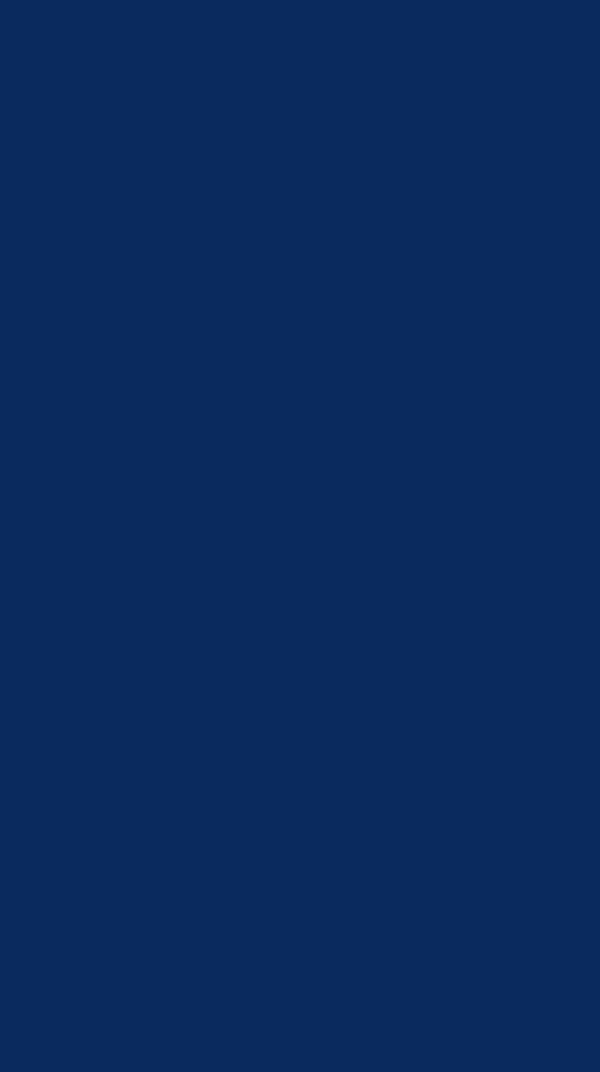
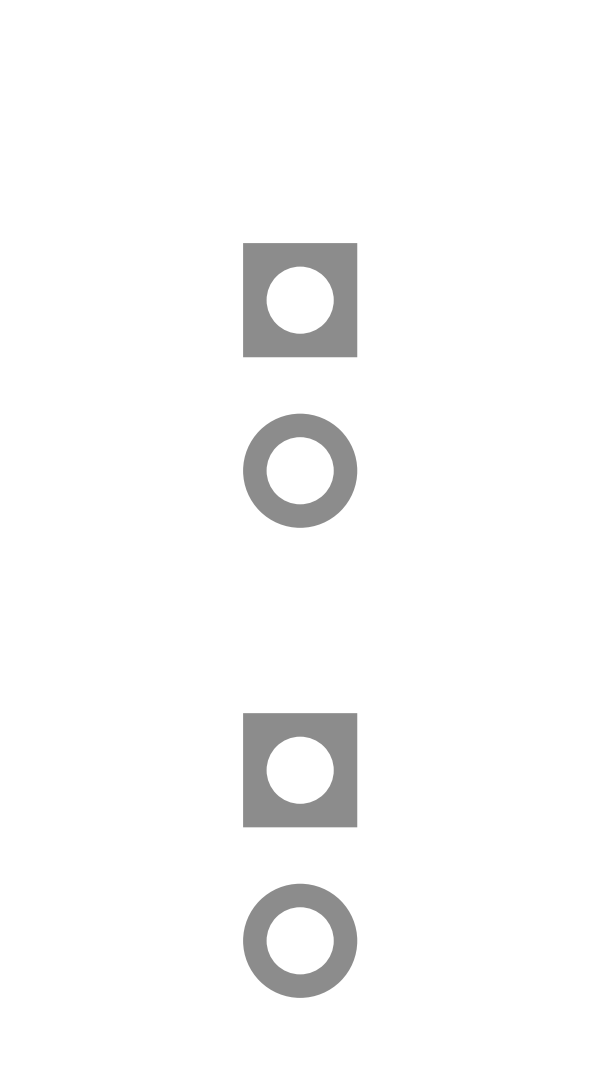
part: none -> (300, 385)
part: none -> (300, 855)

